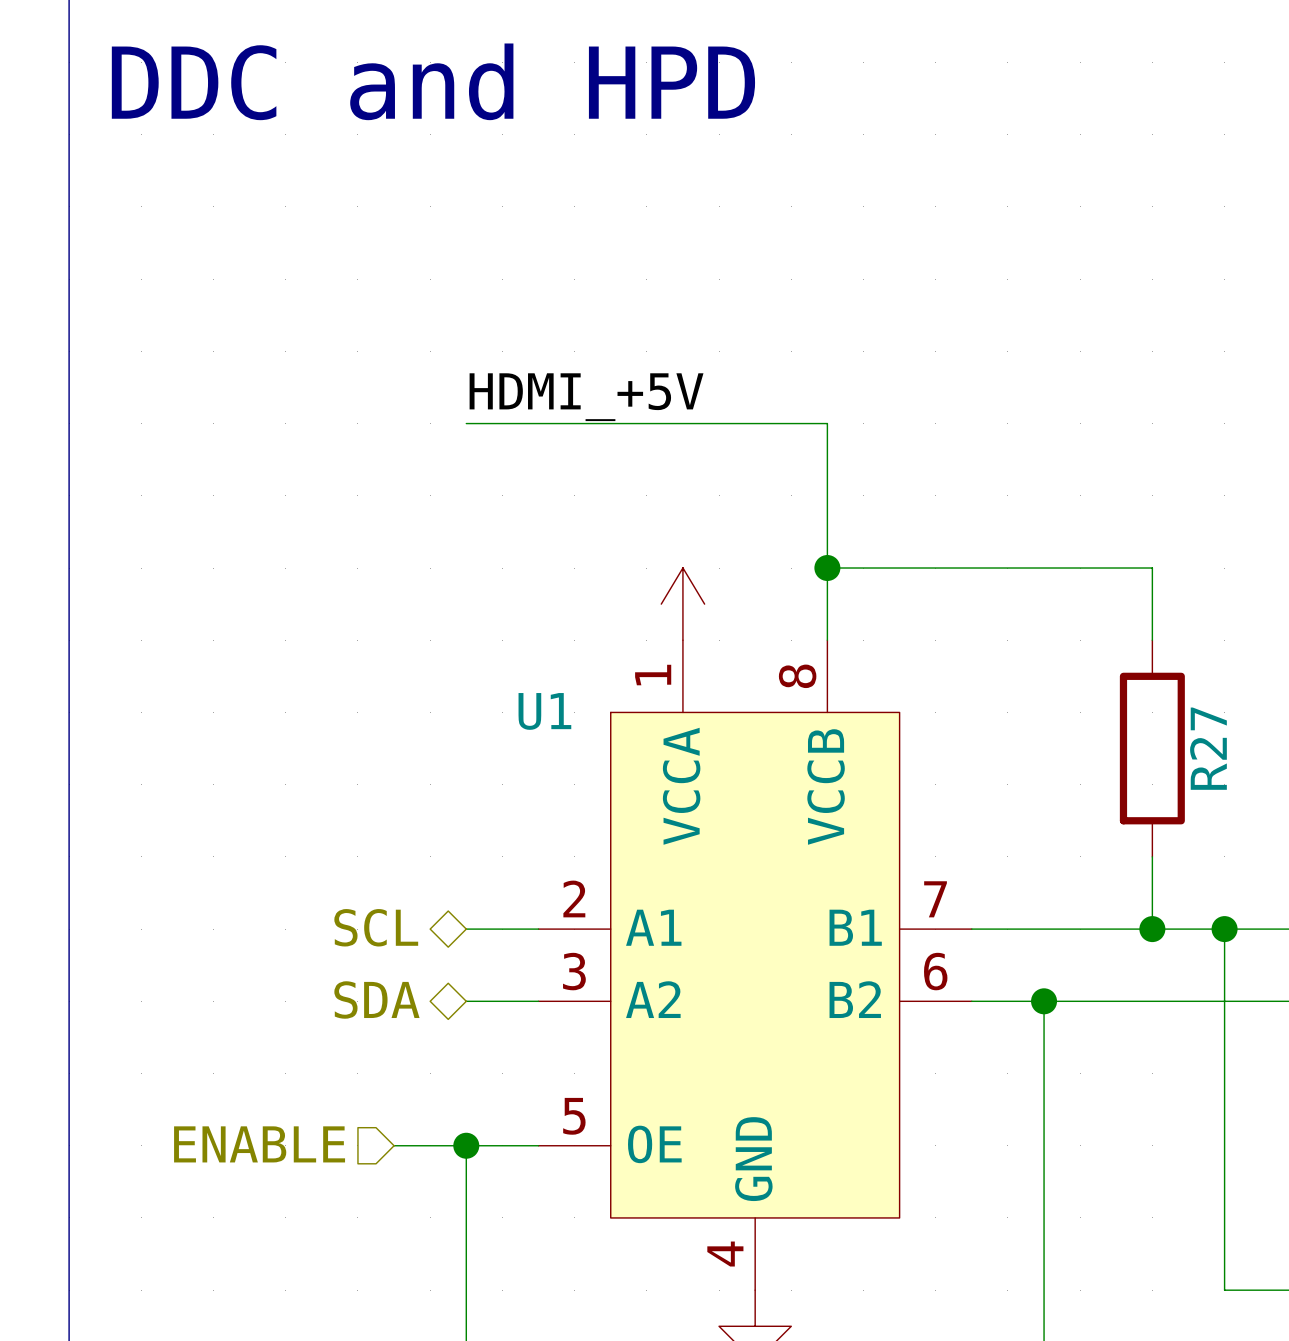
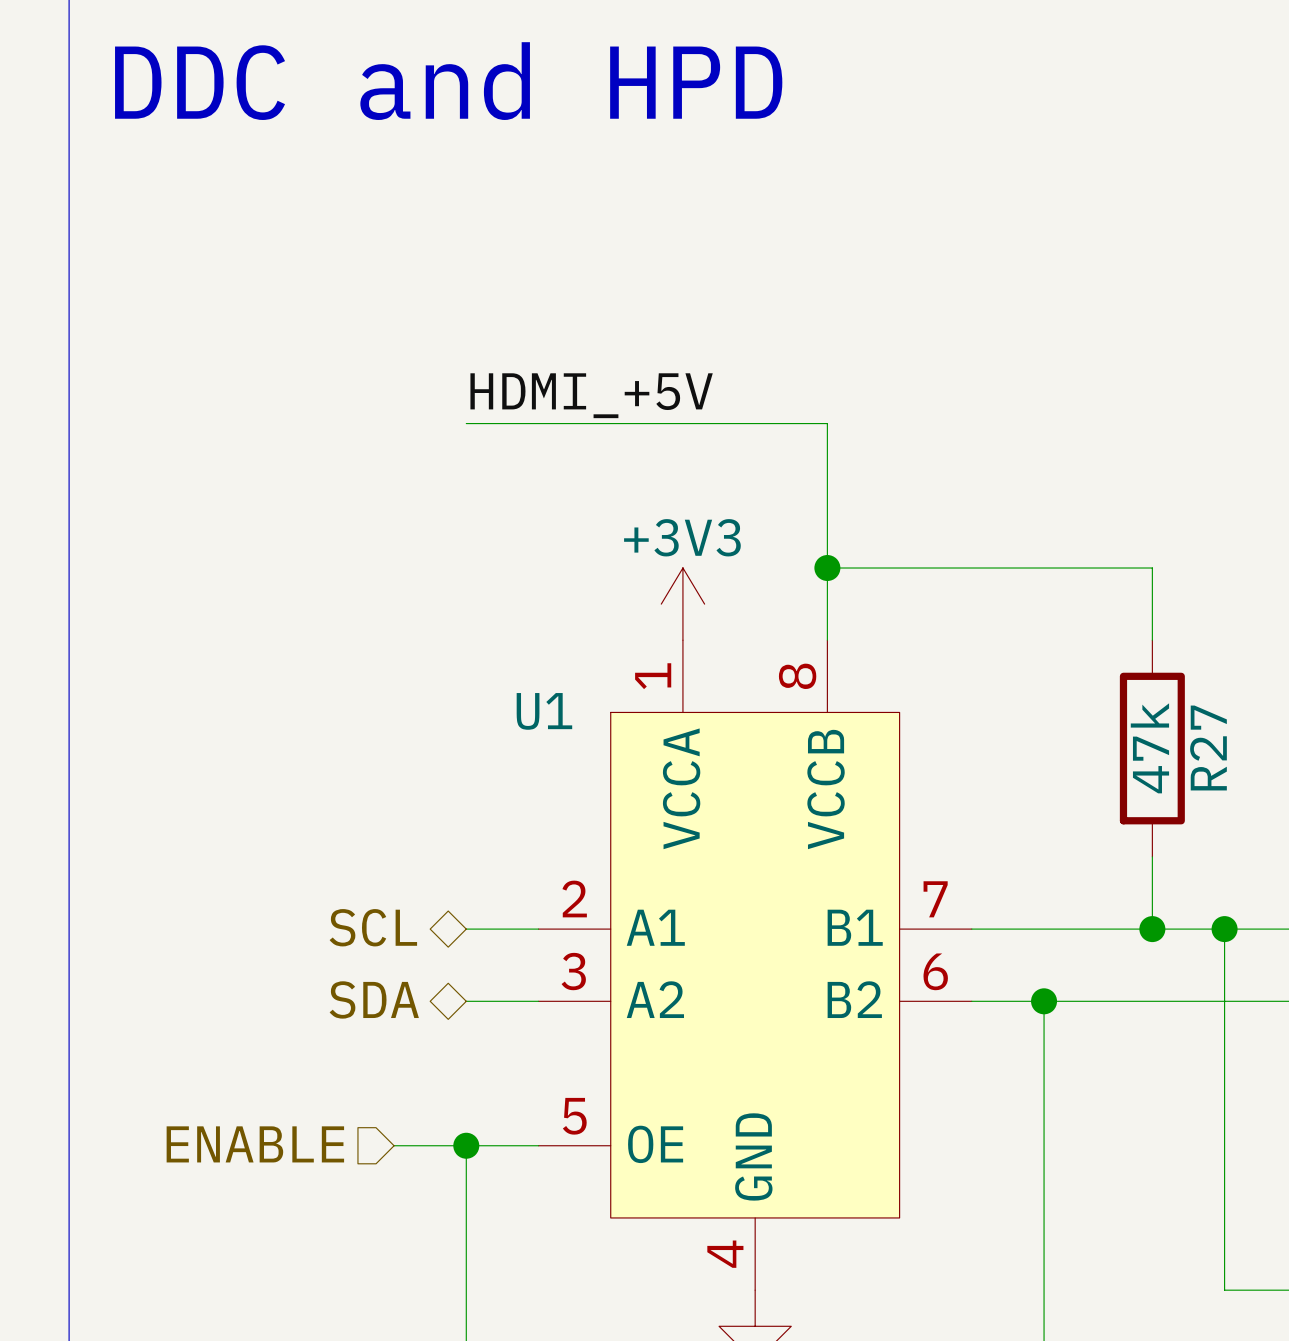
power symbol text: none -> +3V3 (682, 537)
R27 value: none -> 47k (1149, 748)

